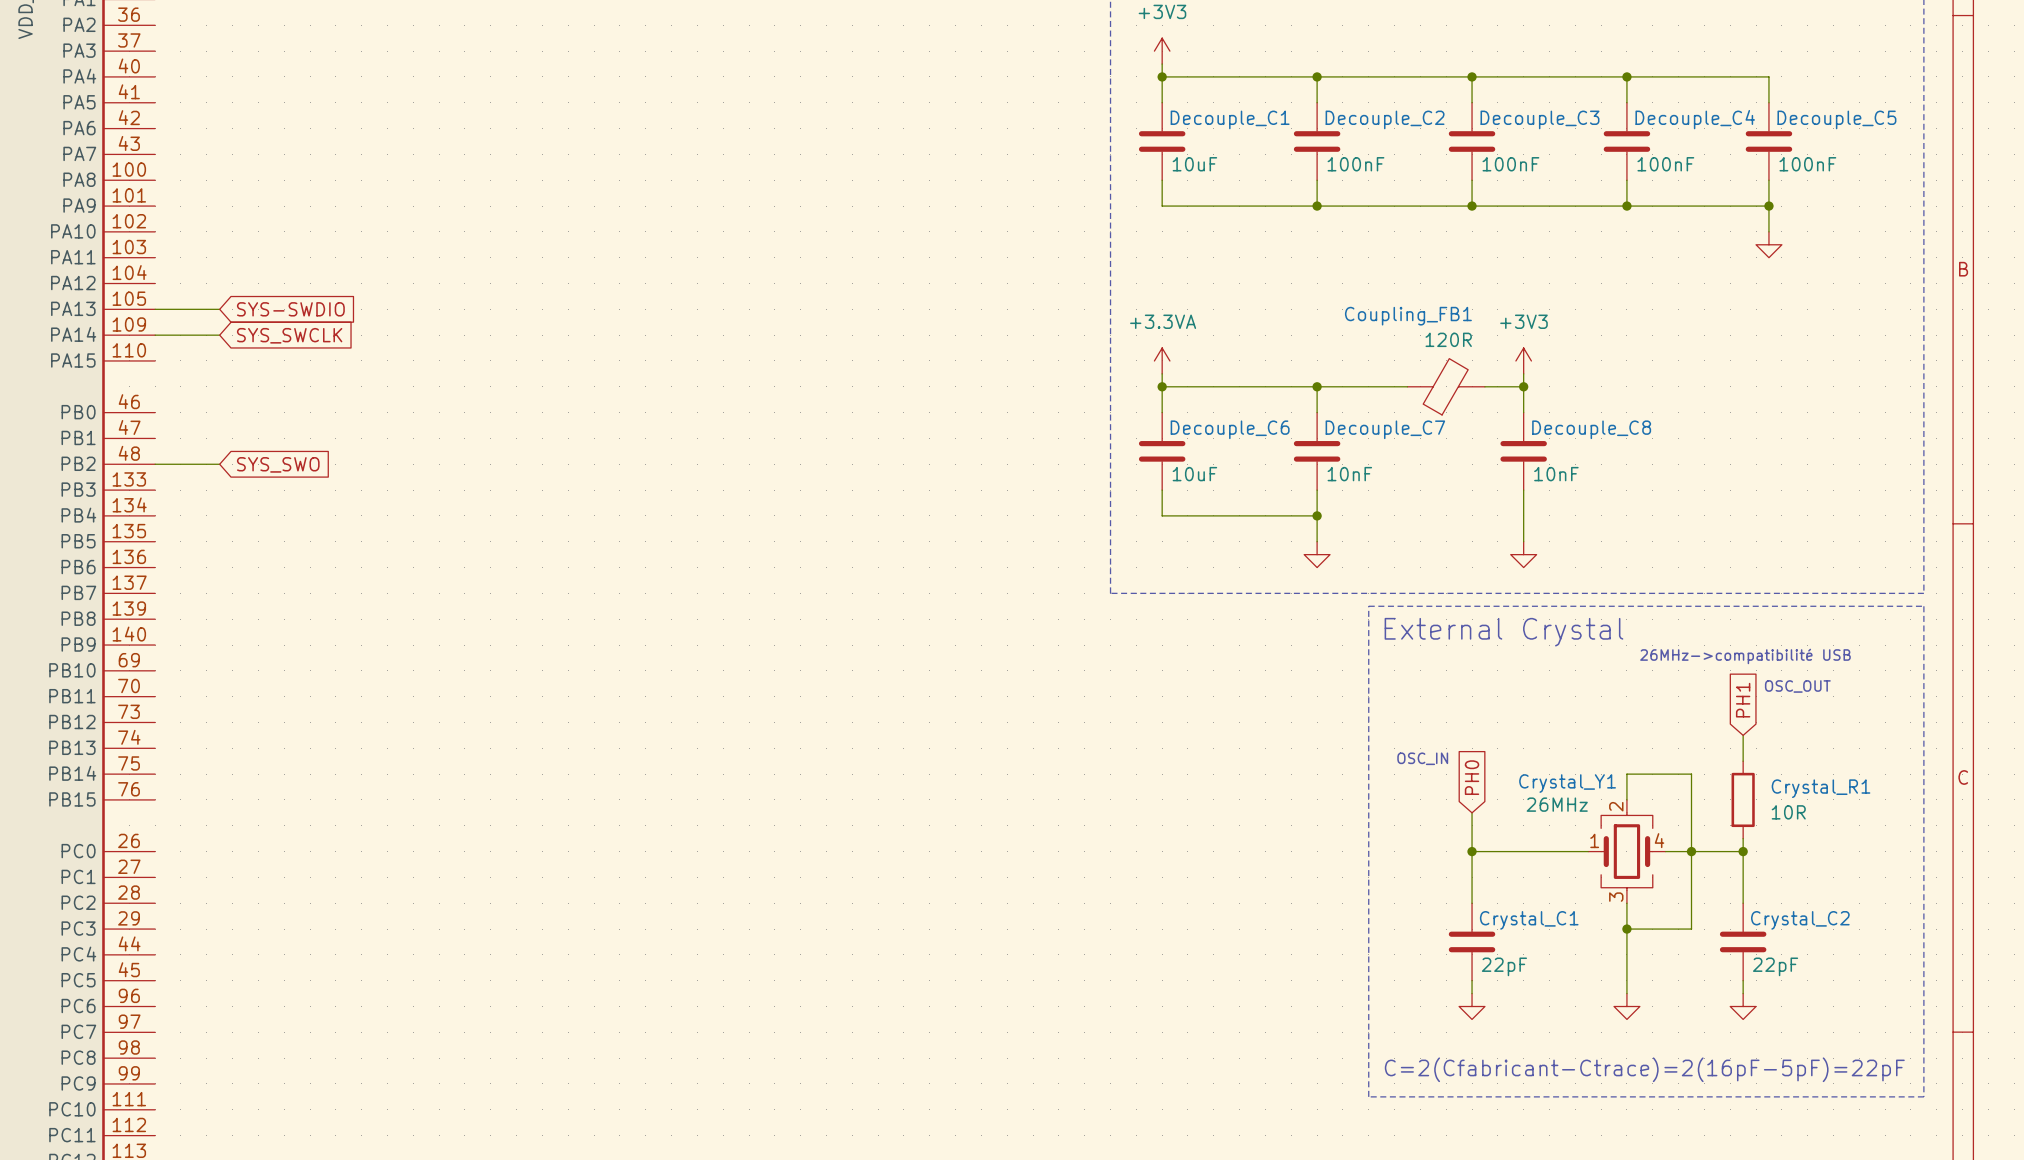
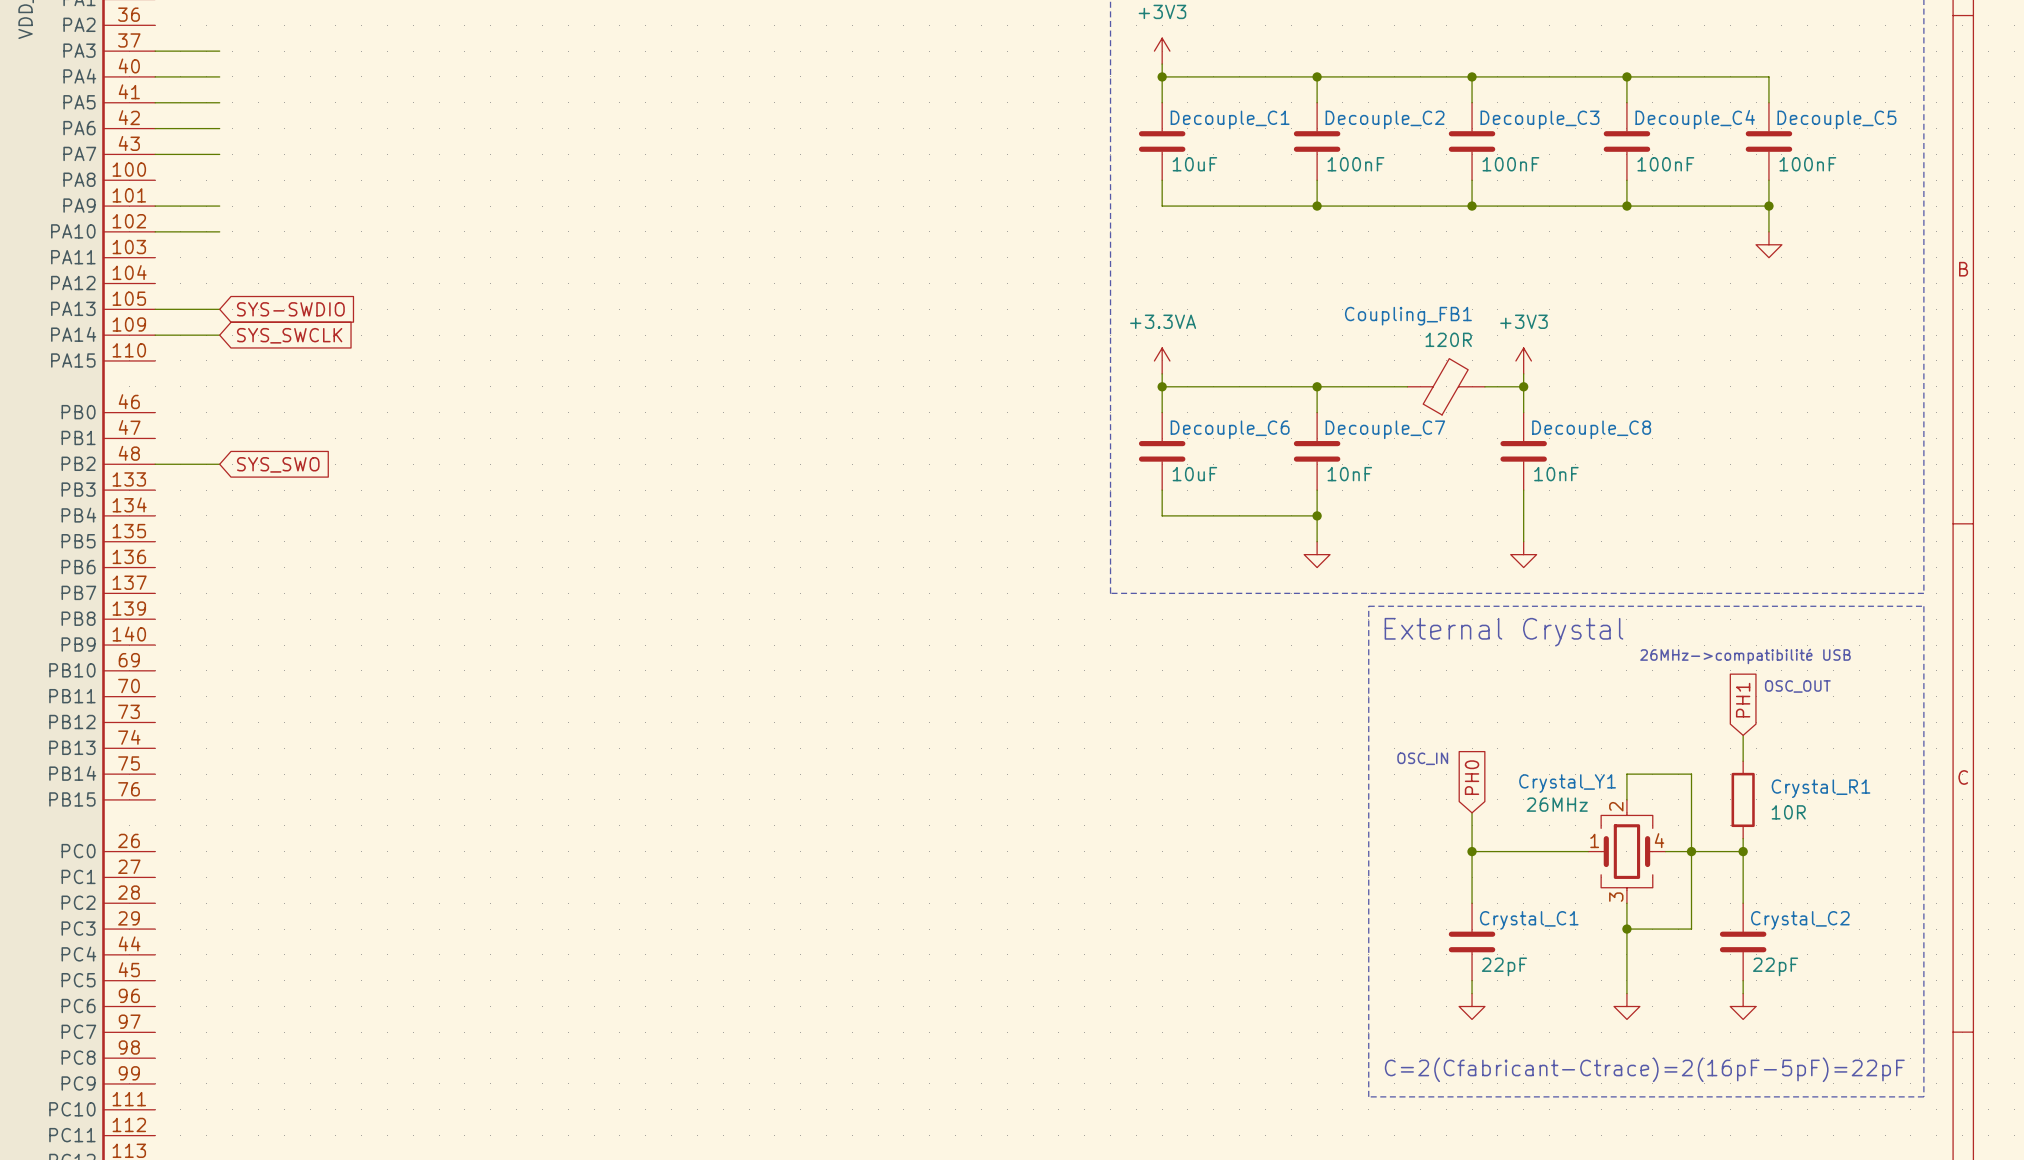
wire: none -> (155, 51) (219, 51)
wire: none -> (155, 76) (219, 76)
wire: none -> (155, 102) (219, 102)
wire: none -> (155, 128) (219, 128)
wire: none -> (155, 154) (219, 154)
wire: none -> (155, 206) (219, 206)
wire: none -> (155, 231) (219, 231)

